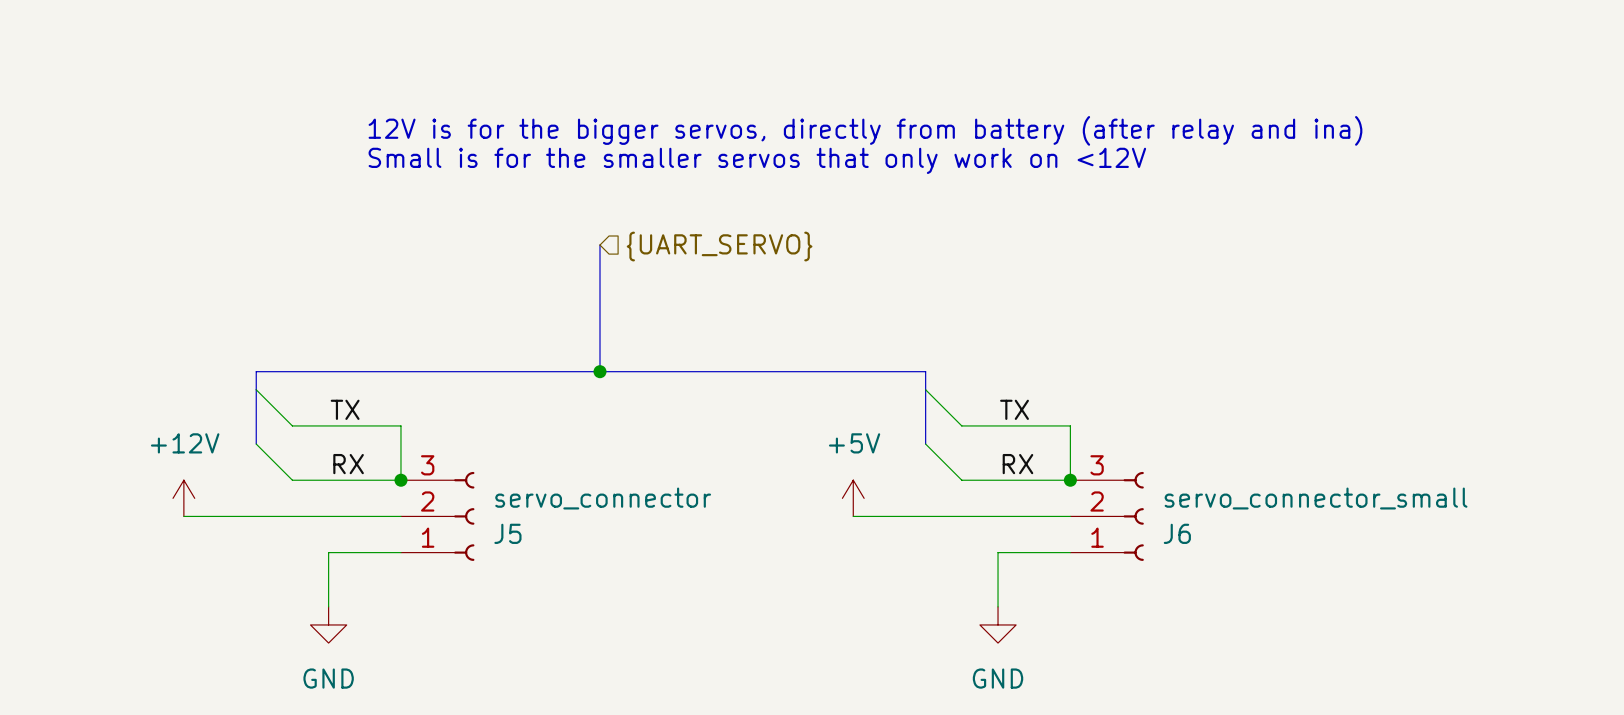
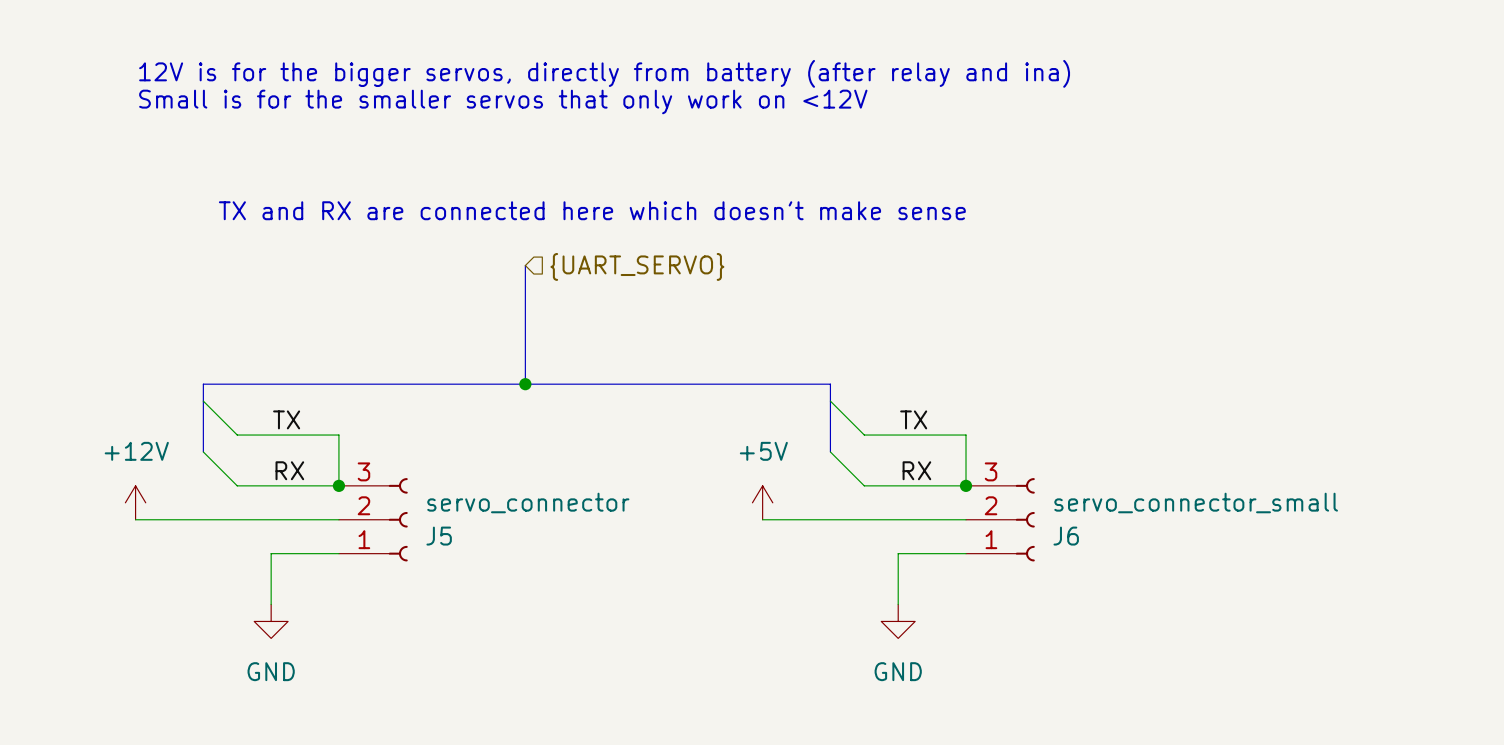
text position: 12V is for the bigger servos, directly from battery (after relay and ina) (865, 130) -> 12V is for the bigger servos, directly from battery (after relay and ina) (604, 73)
text position: Small is for the smaller servos that only work on <12V (757, 160) -> Small is for the smaller servos that only work on <12V (503, 101)
text: none -> TX and RX are connected here which doesn't make sense (592, 210)

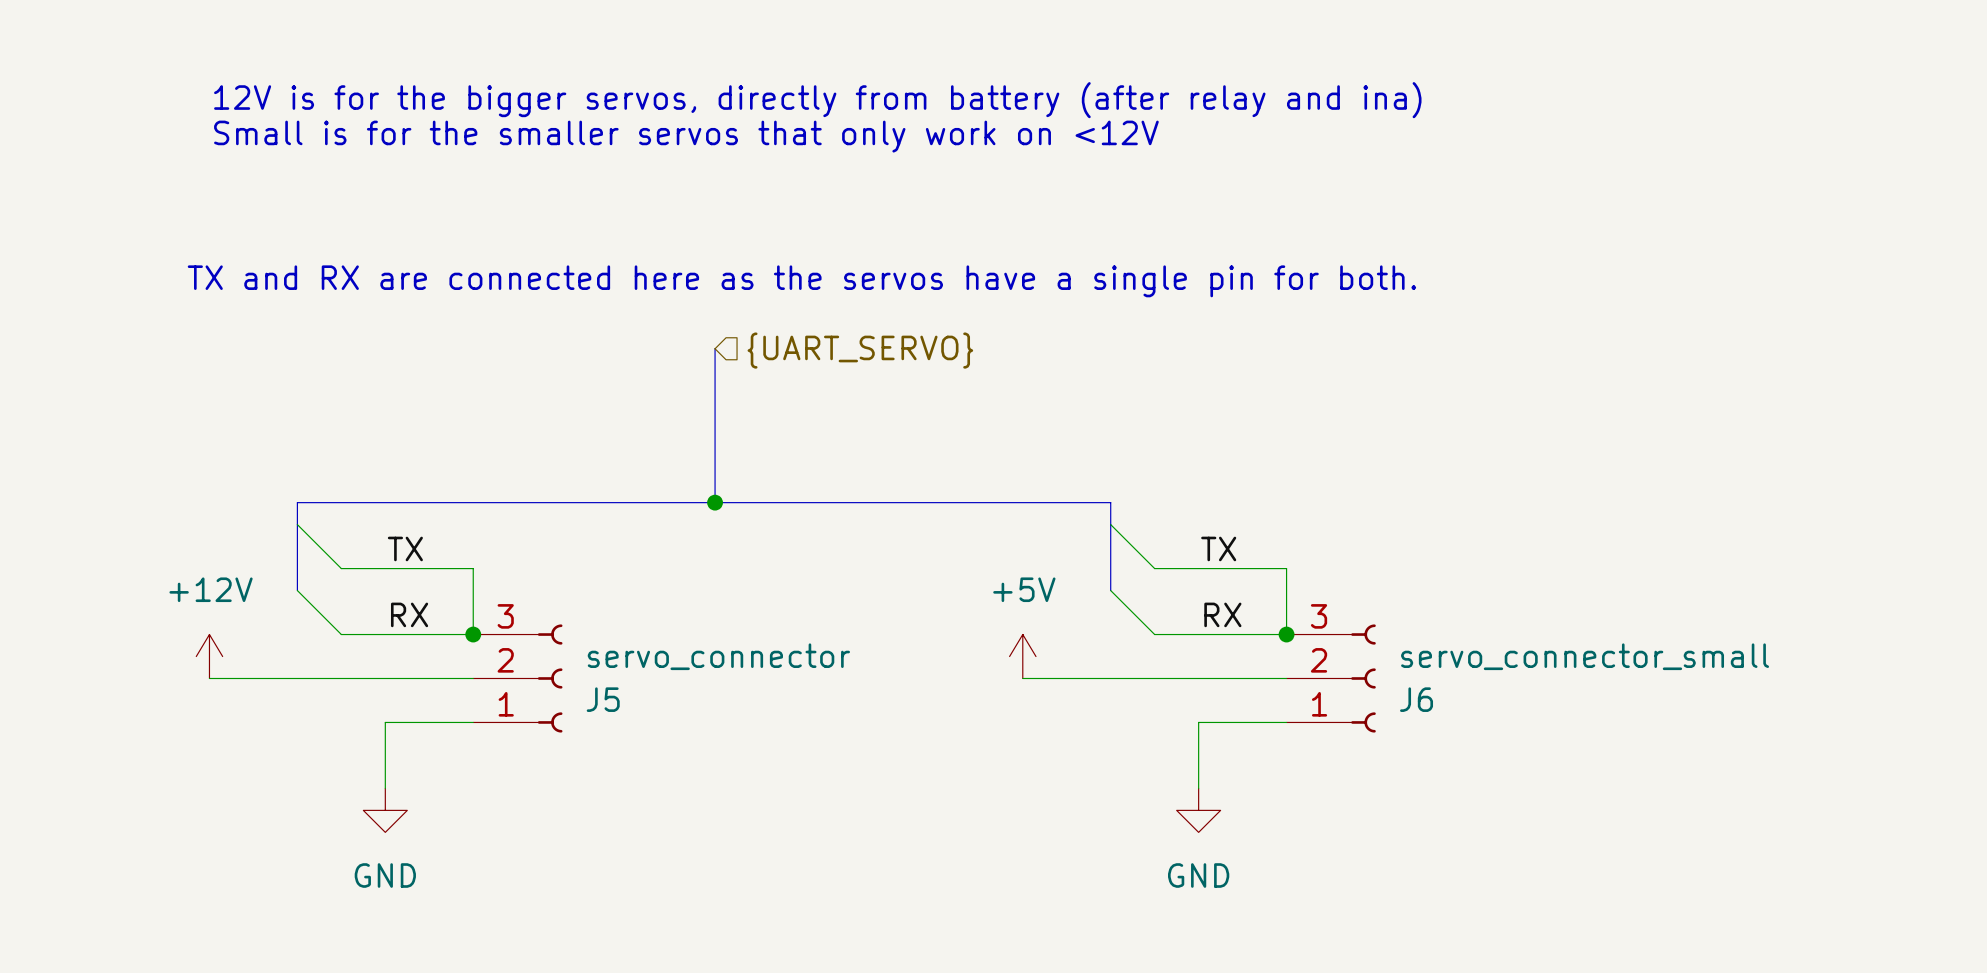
text: TX and RX are connected here which doesn't make sense (592, 210) -> TX and RX are connected here as the servos have a single pin for both. (801, 281)

